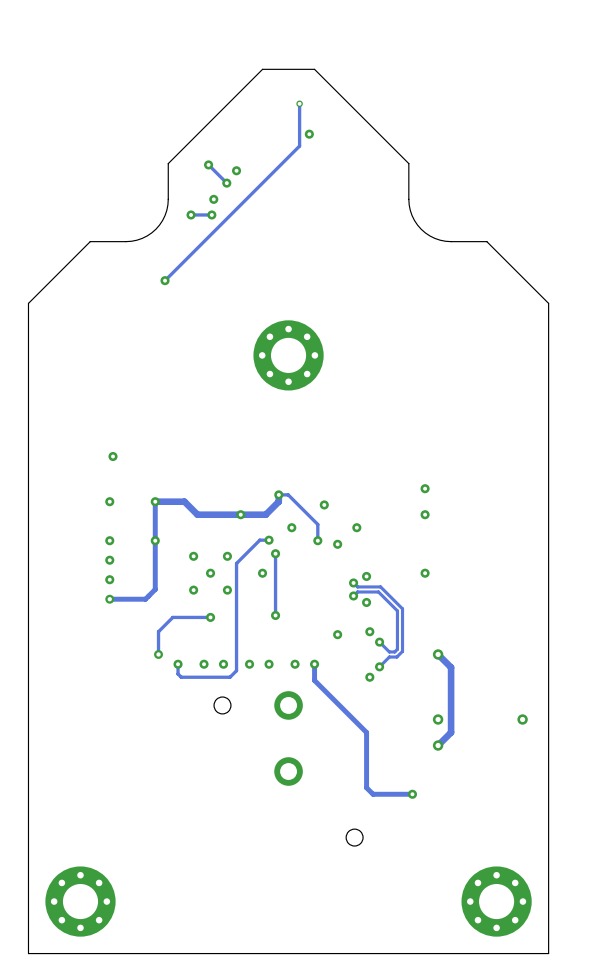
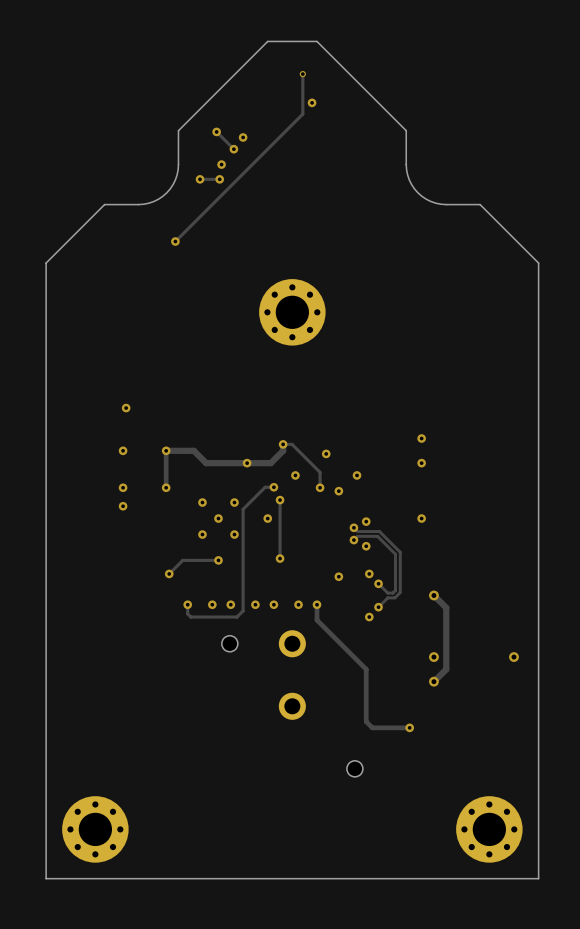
track: (155, 540) (155, 589) (145, 599) (109, 599) -> none
via position: (109, 579) -> (169, 573)
via: (109, 599) -> none
track: (158, 631) (158, 654) -> none
via: (158, 654) -> none

